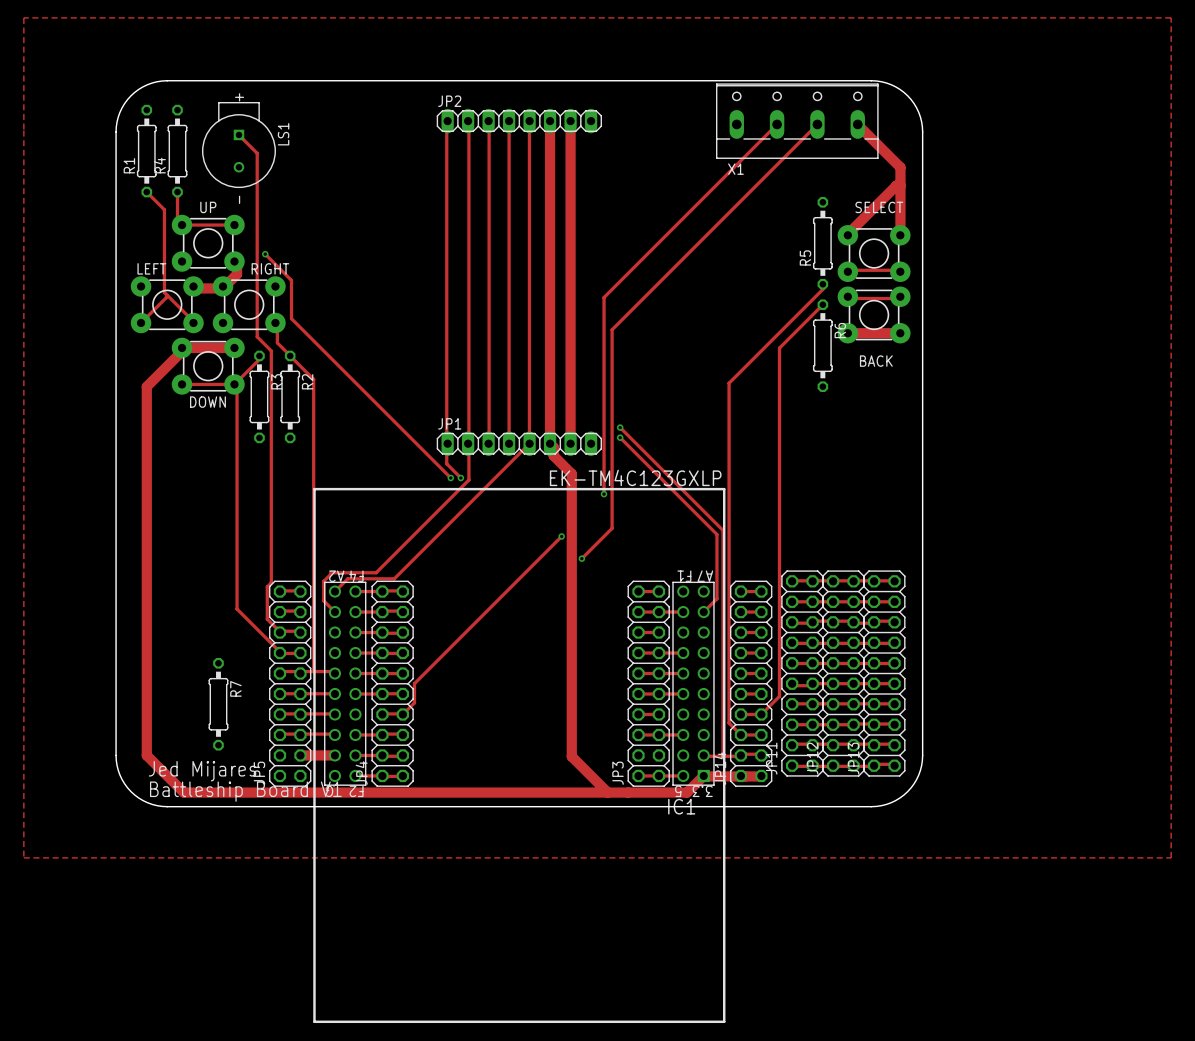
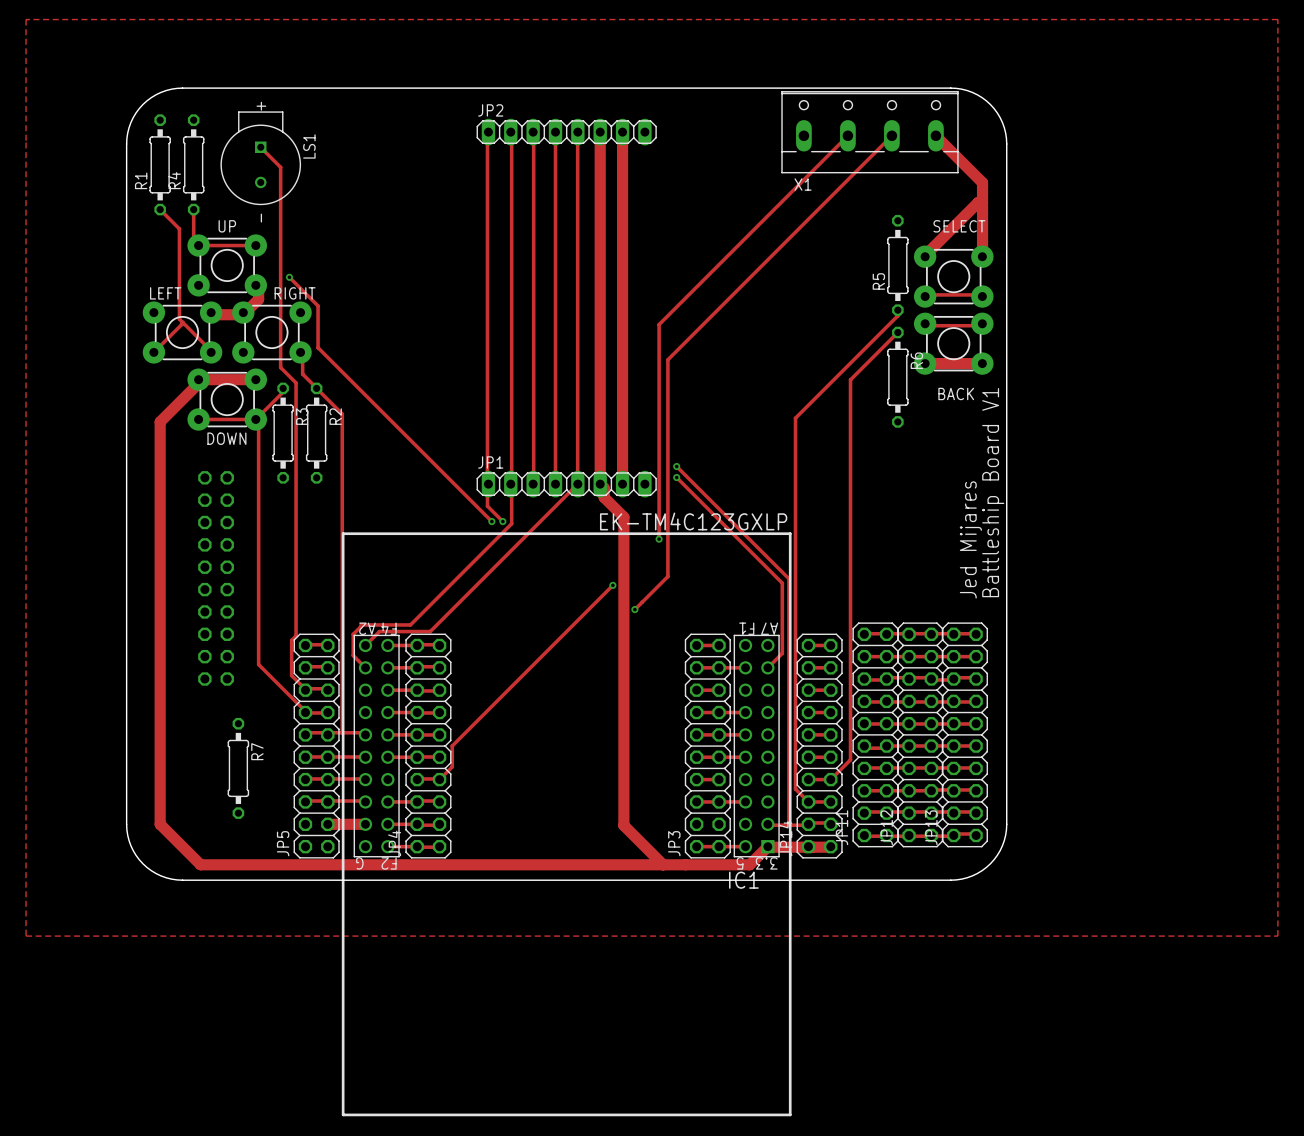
text: none -> Battleship Board V1 (993, 492)
text: none -> Jed Mijares (970, 539)
part: none -> (216, 578)
text: Jed Mijares (202, 771) -> none
text: Battleship Board V1 (245, 791) -> none

